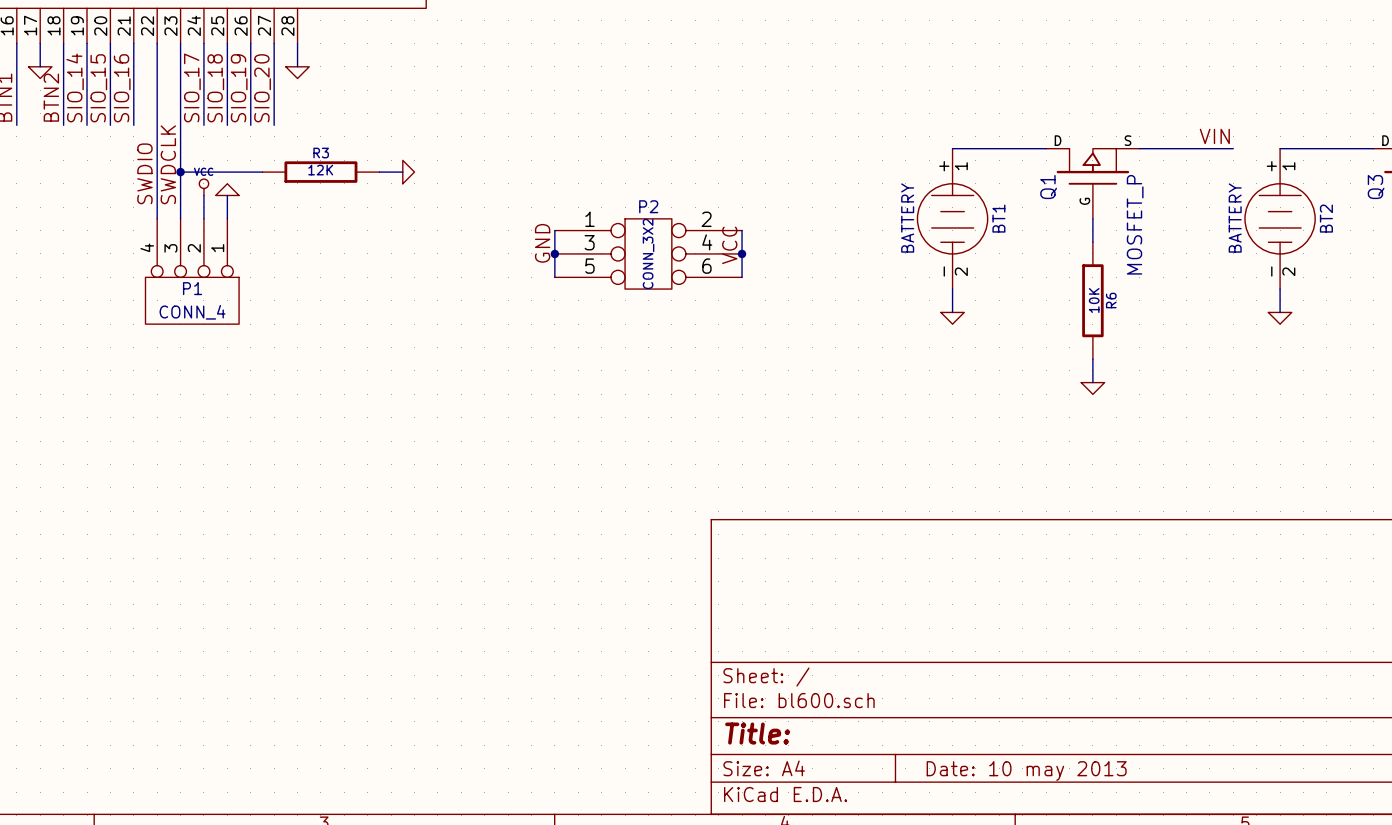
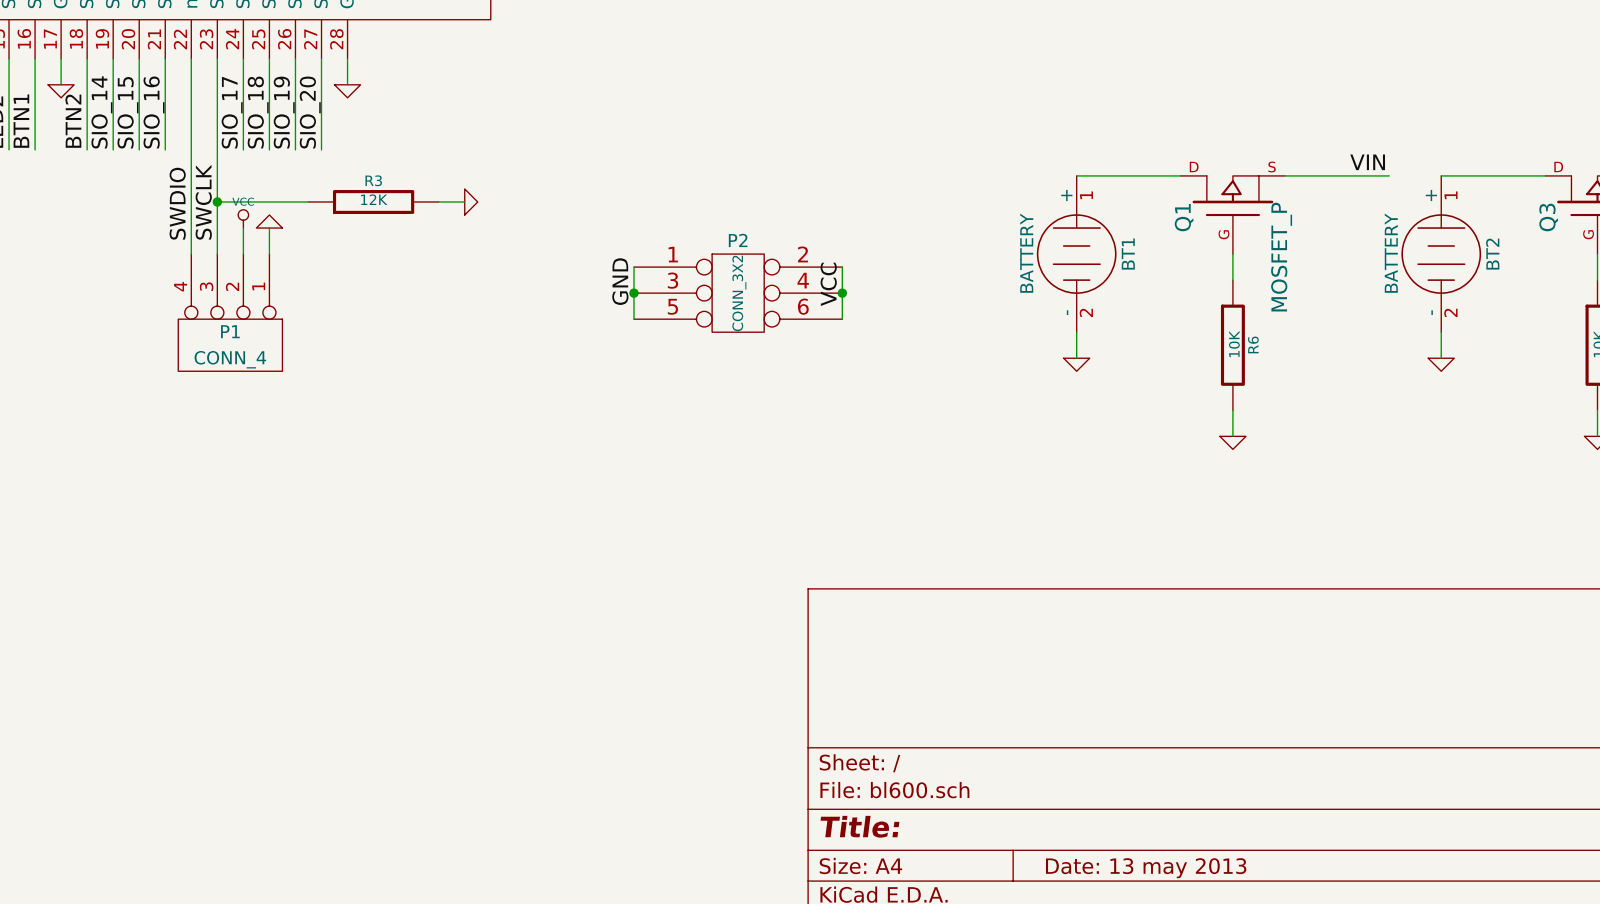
label: SWDCLK (168, 164) -> SWCLK (203, 202)
title block: Date: 10 may 2013 (1026, 771) -> Date: 13 may 2013 (1146, 868)

